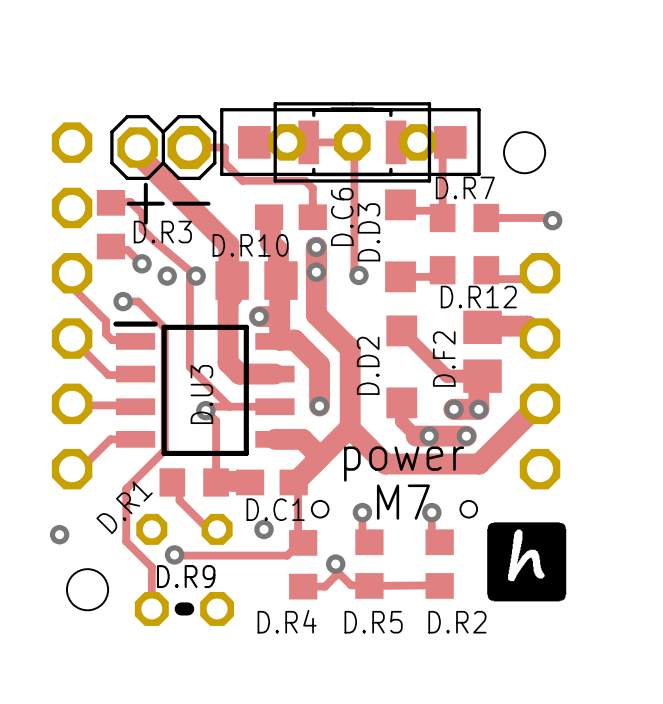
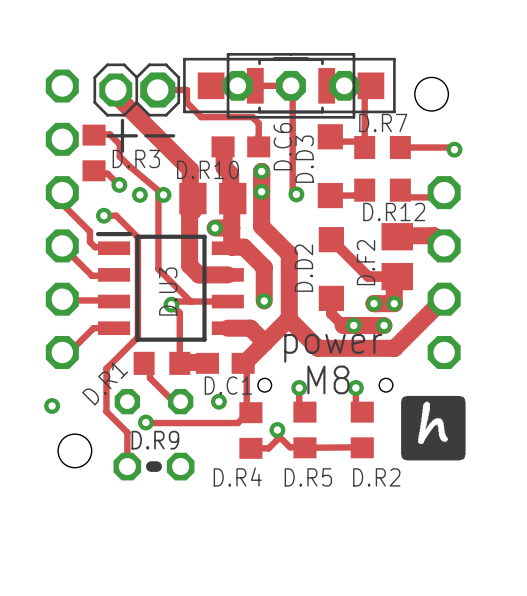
text: M7 (403, 502) -> M8 (328, 379)

